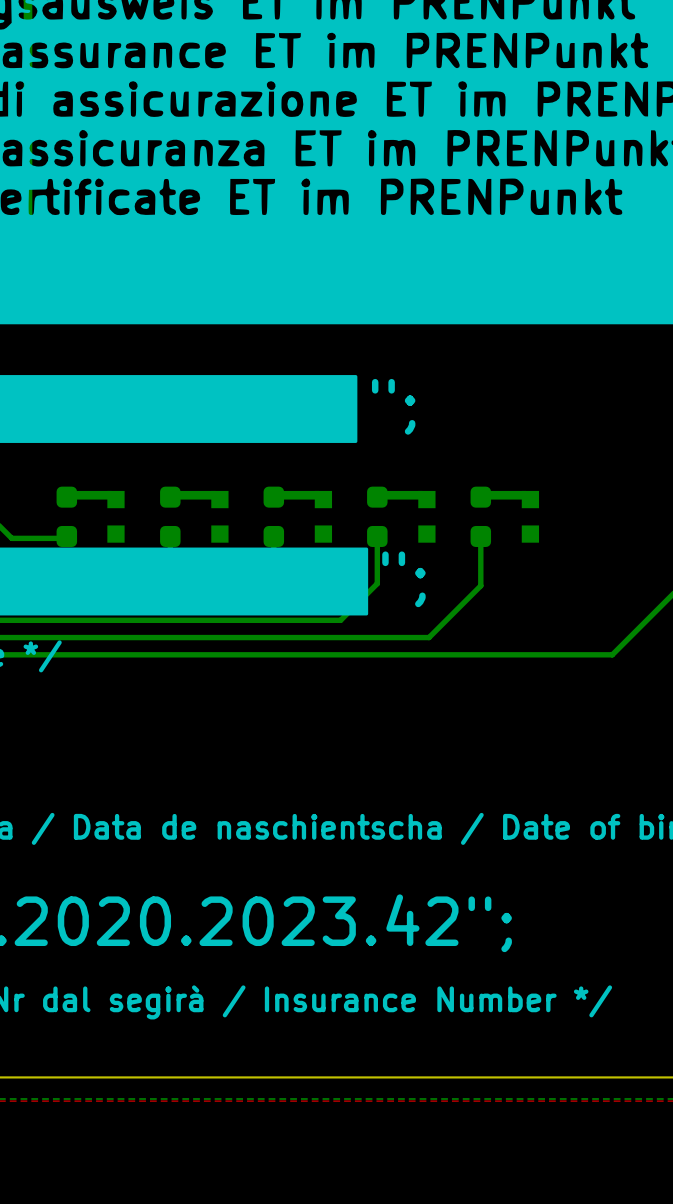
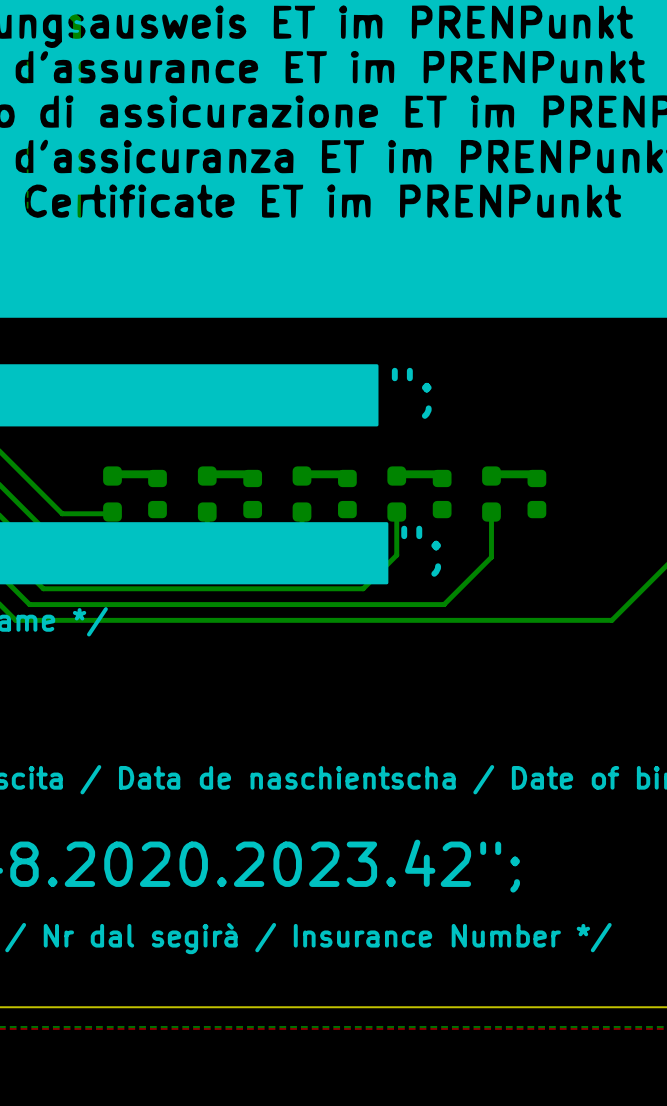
part footprint: [107, 490, 125, 543] -> [148, 469, 167, 519]
part footprint: [211, 490, 229, 543] -> [243, 469, 263, 519]
part footprint: [314, 490, 333, 543] -> [338, 469, 357, 519]
part footprint: [418, 490, 436, 543] -> [432, 469, 452, 519]
part footprint: [521, 490, 540, 543] -> [527, 469, 547, 519]

